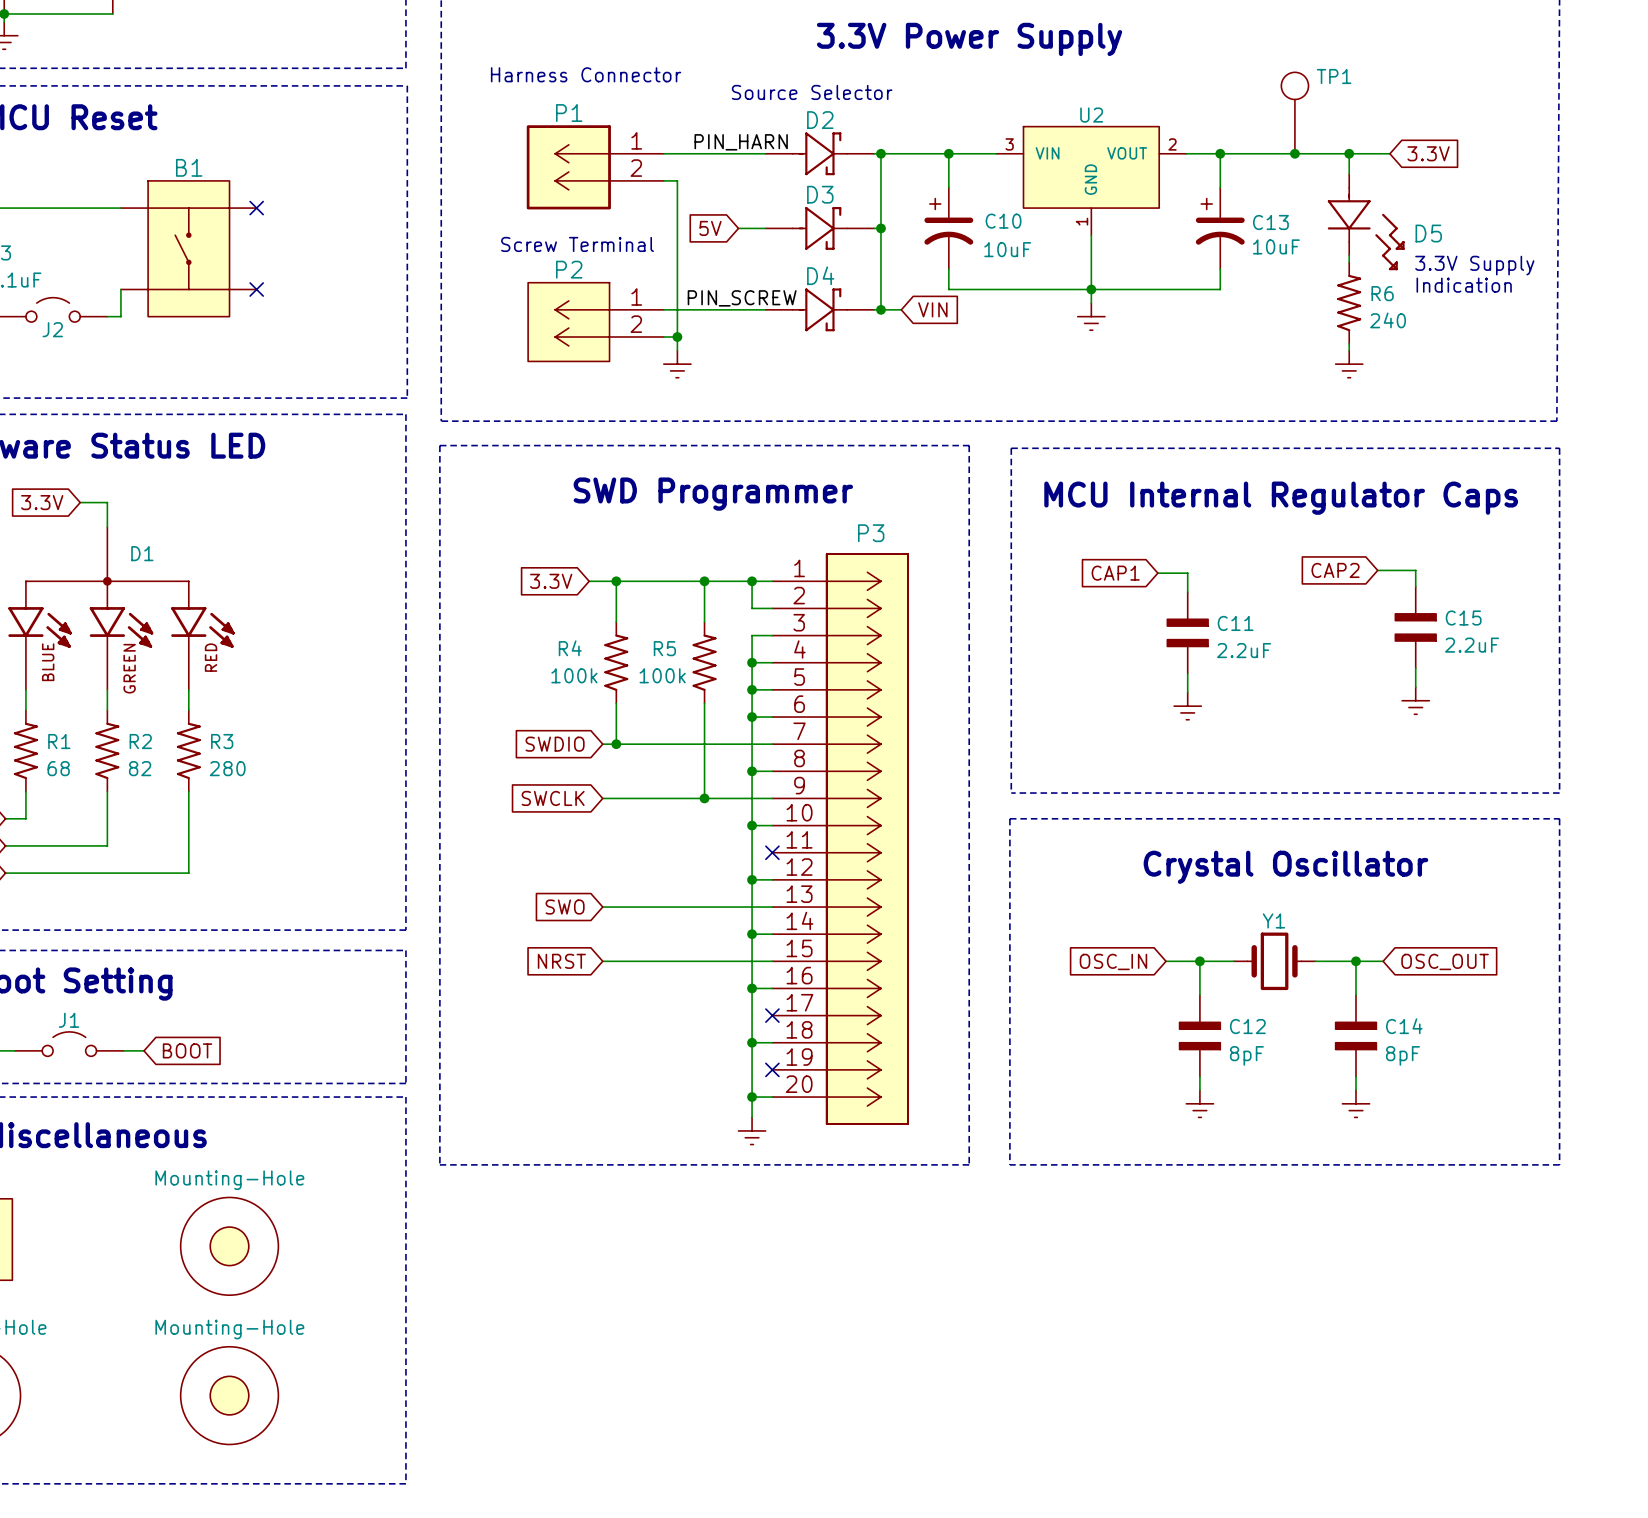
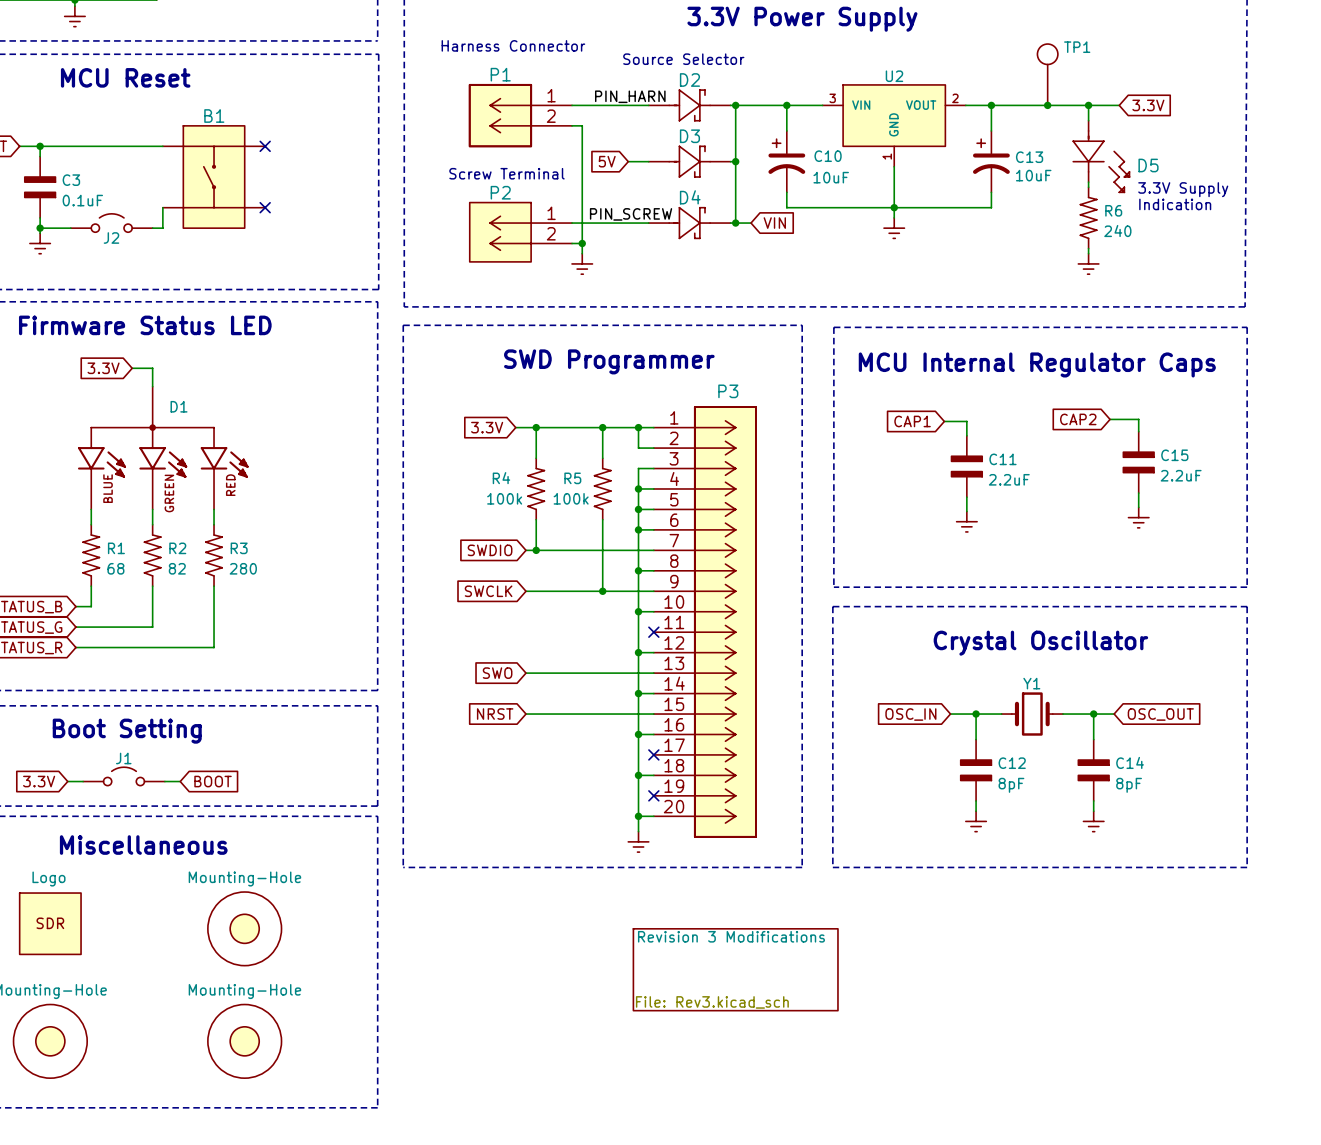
sheet Revision 3 Modifications: none -> File: Rev3.kicad_sch (735, 969)

